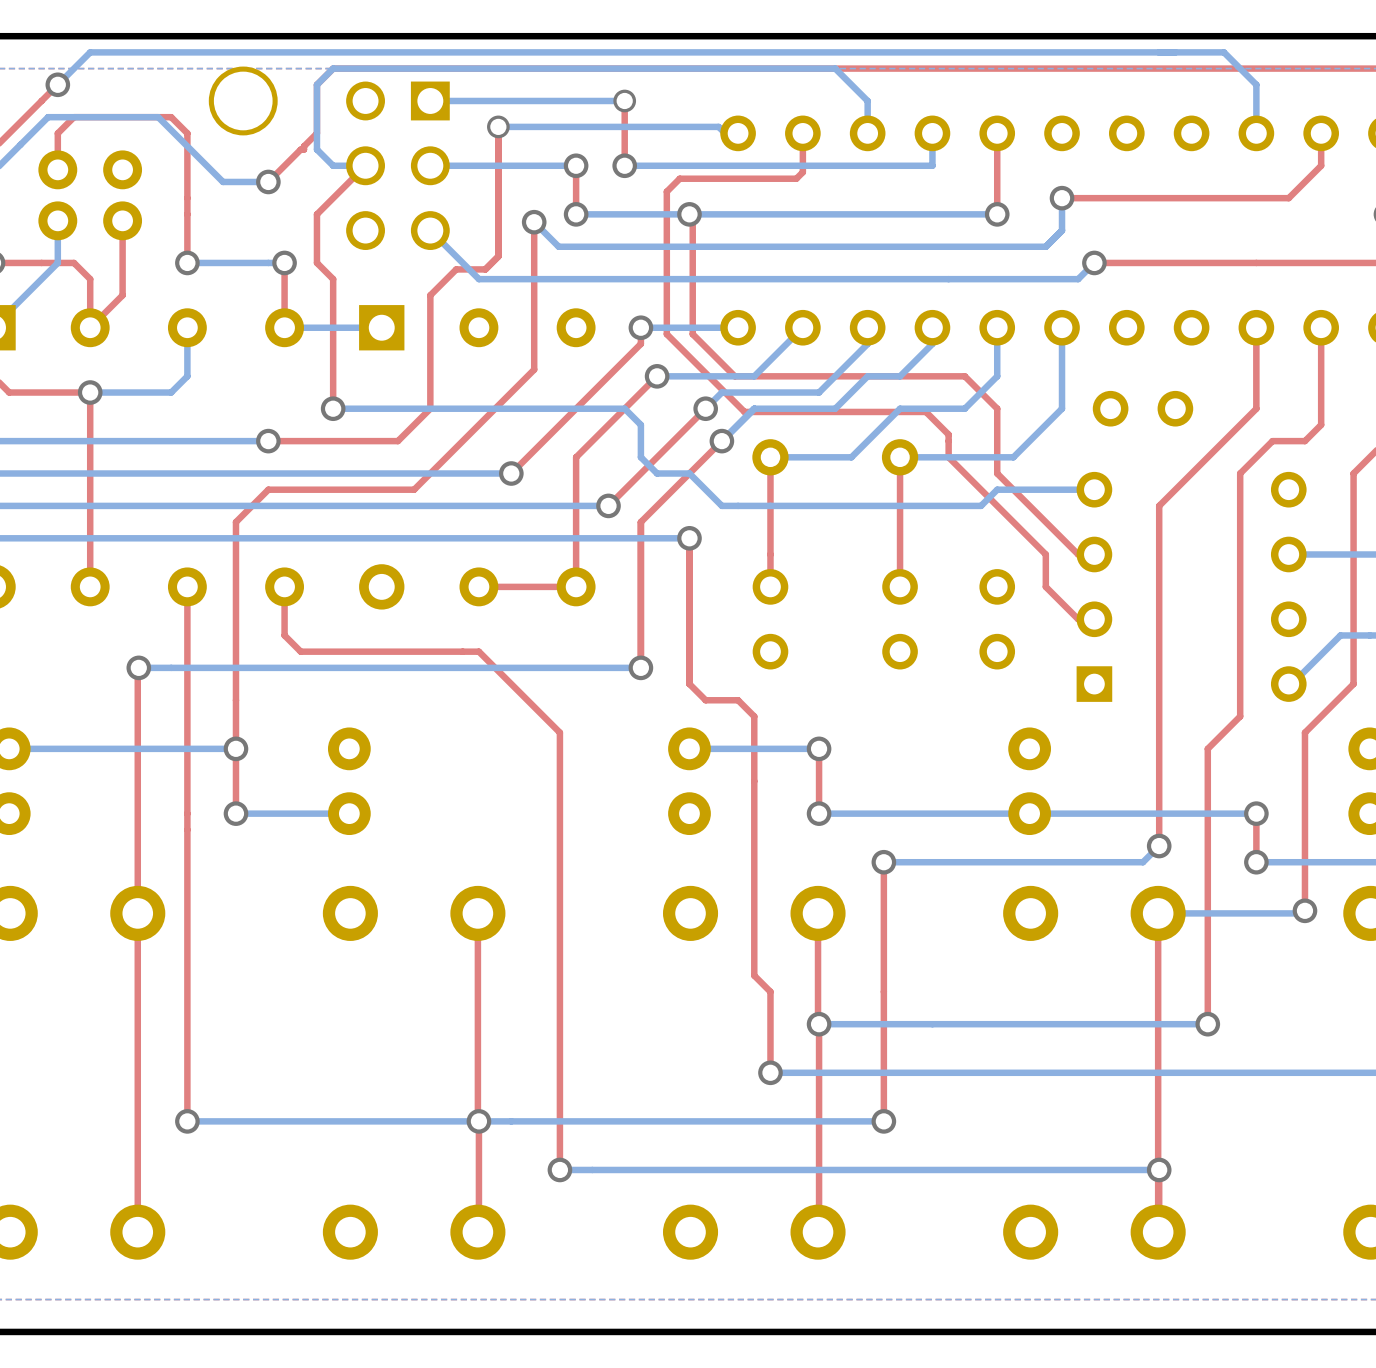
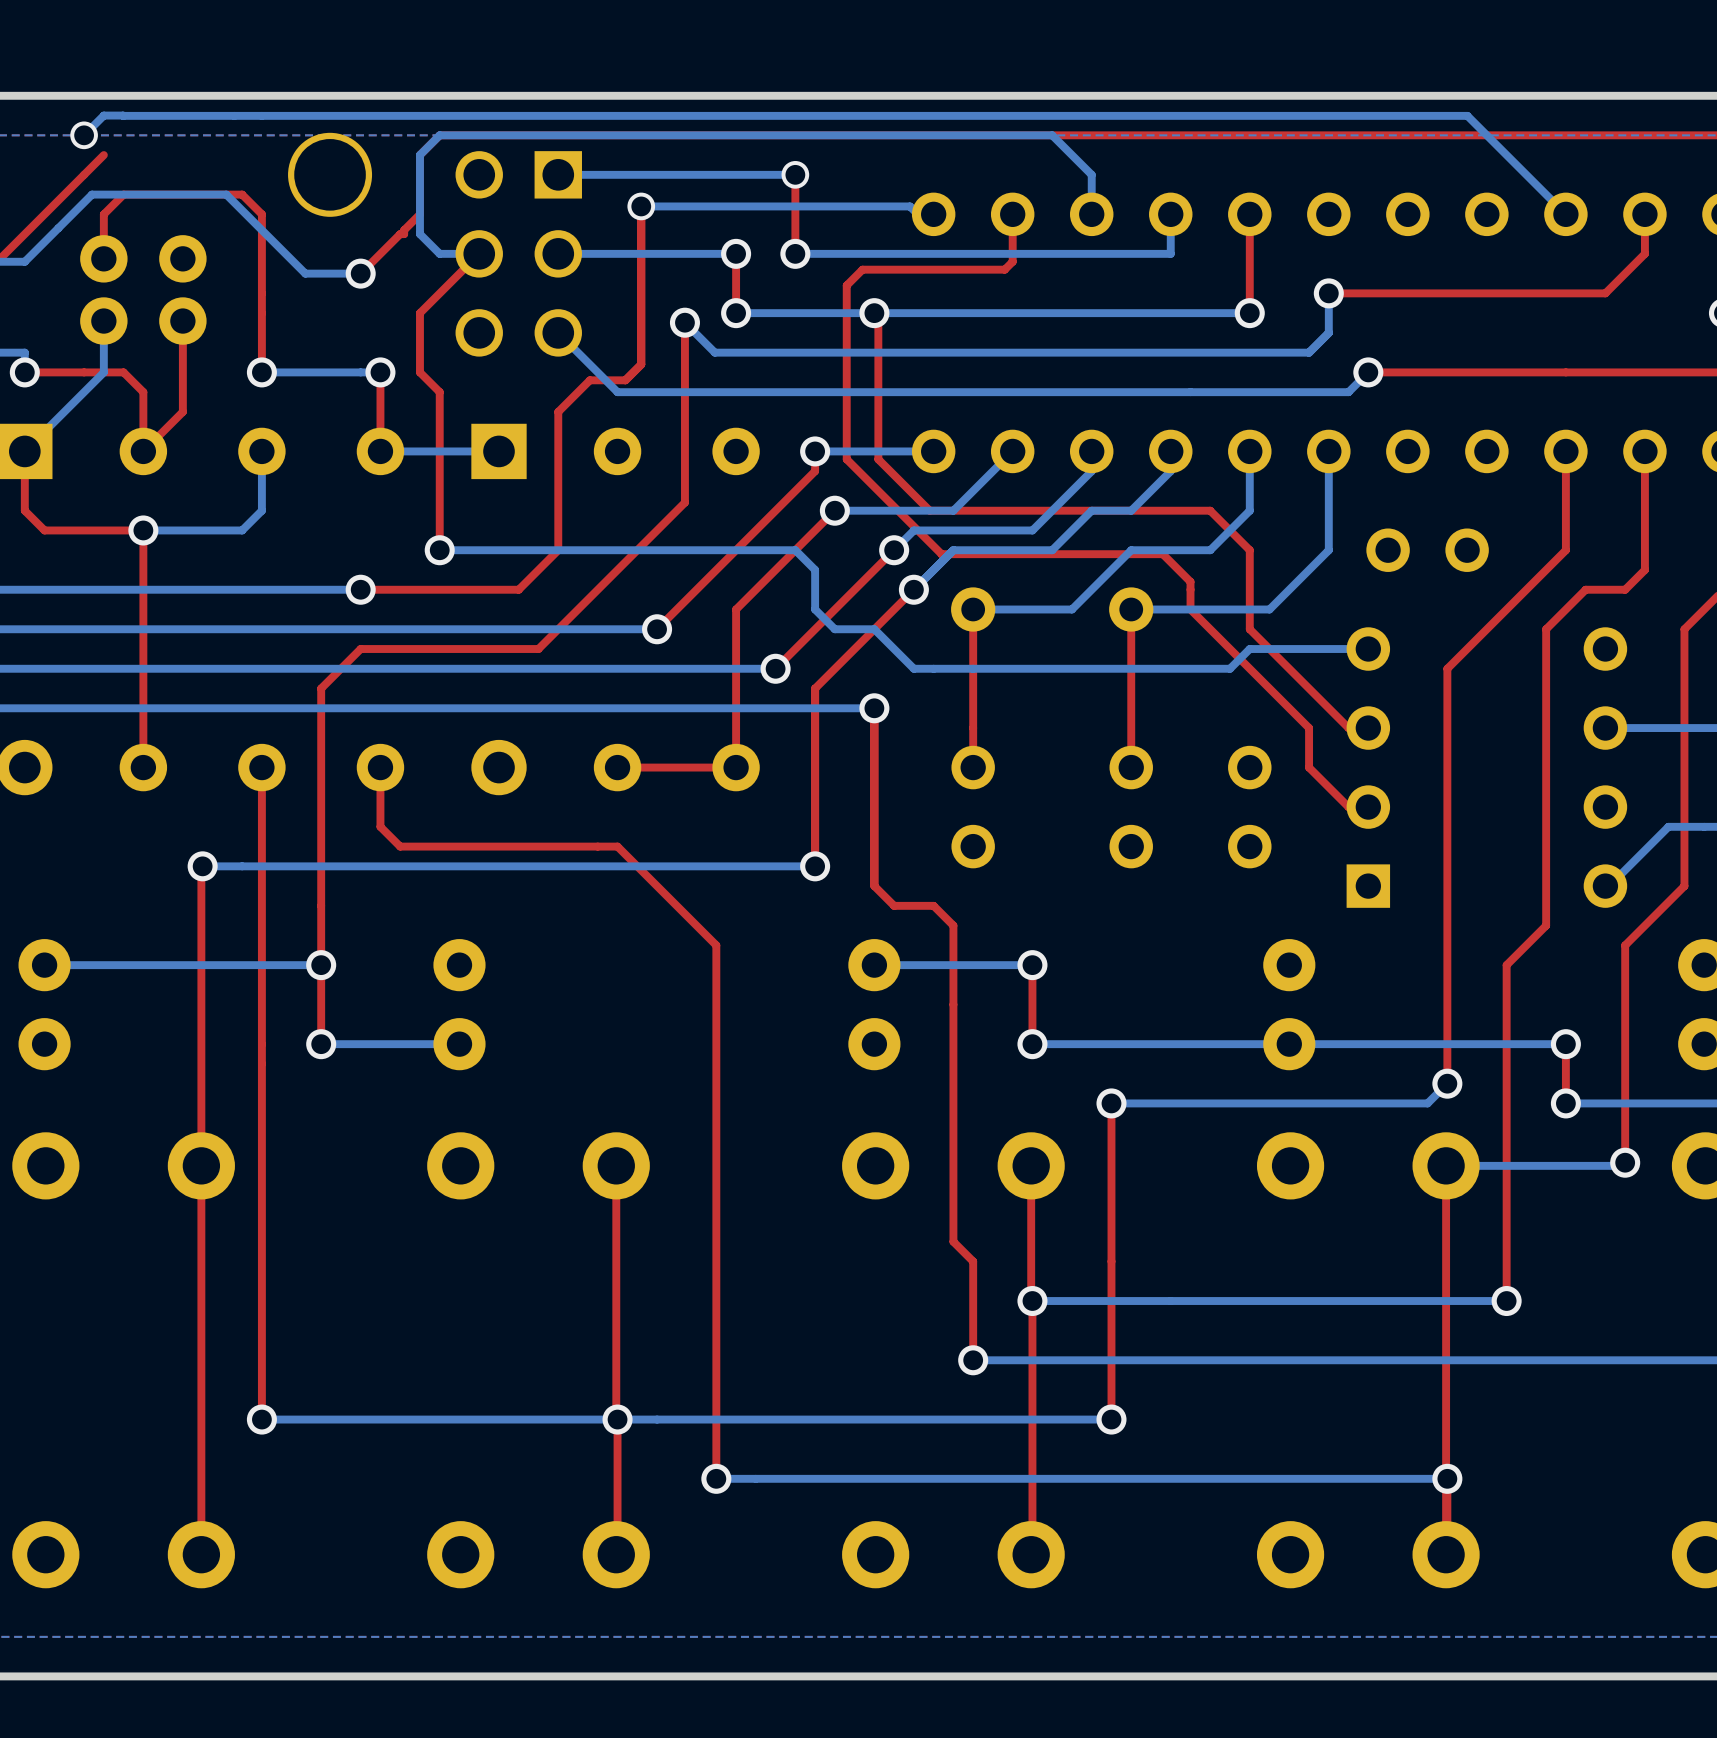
bottom track: none -> (122, 115) (103, 115) (84, 135)
bottom track: (57, 84) (90, 52) (1223, 52) (1256, 84) (1256, 133) -> (123, 115) (1467, 115) (1565, 214)
via position: (57, 84) -> (84, 135)

